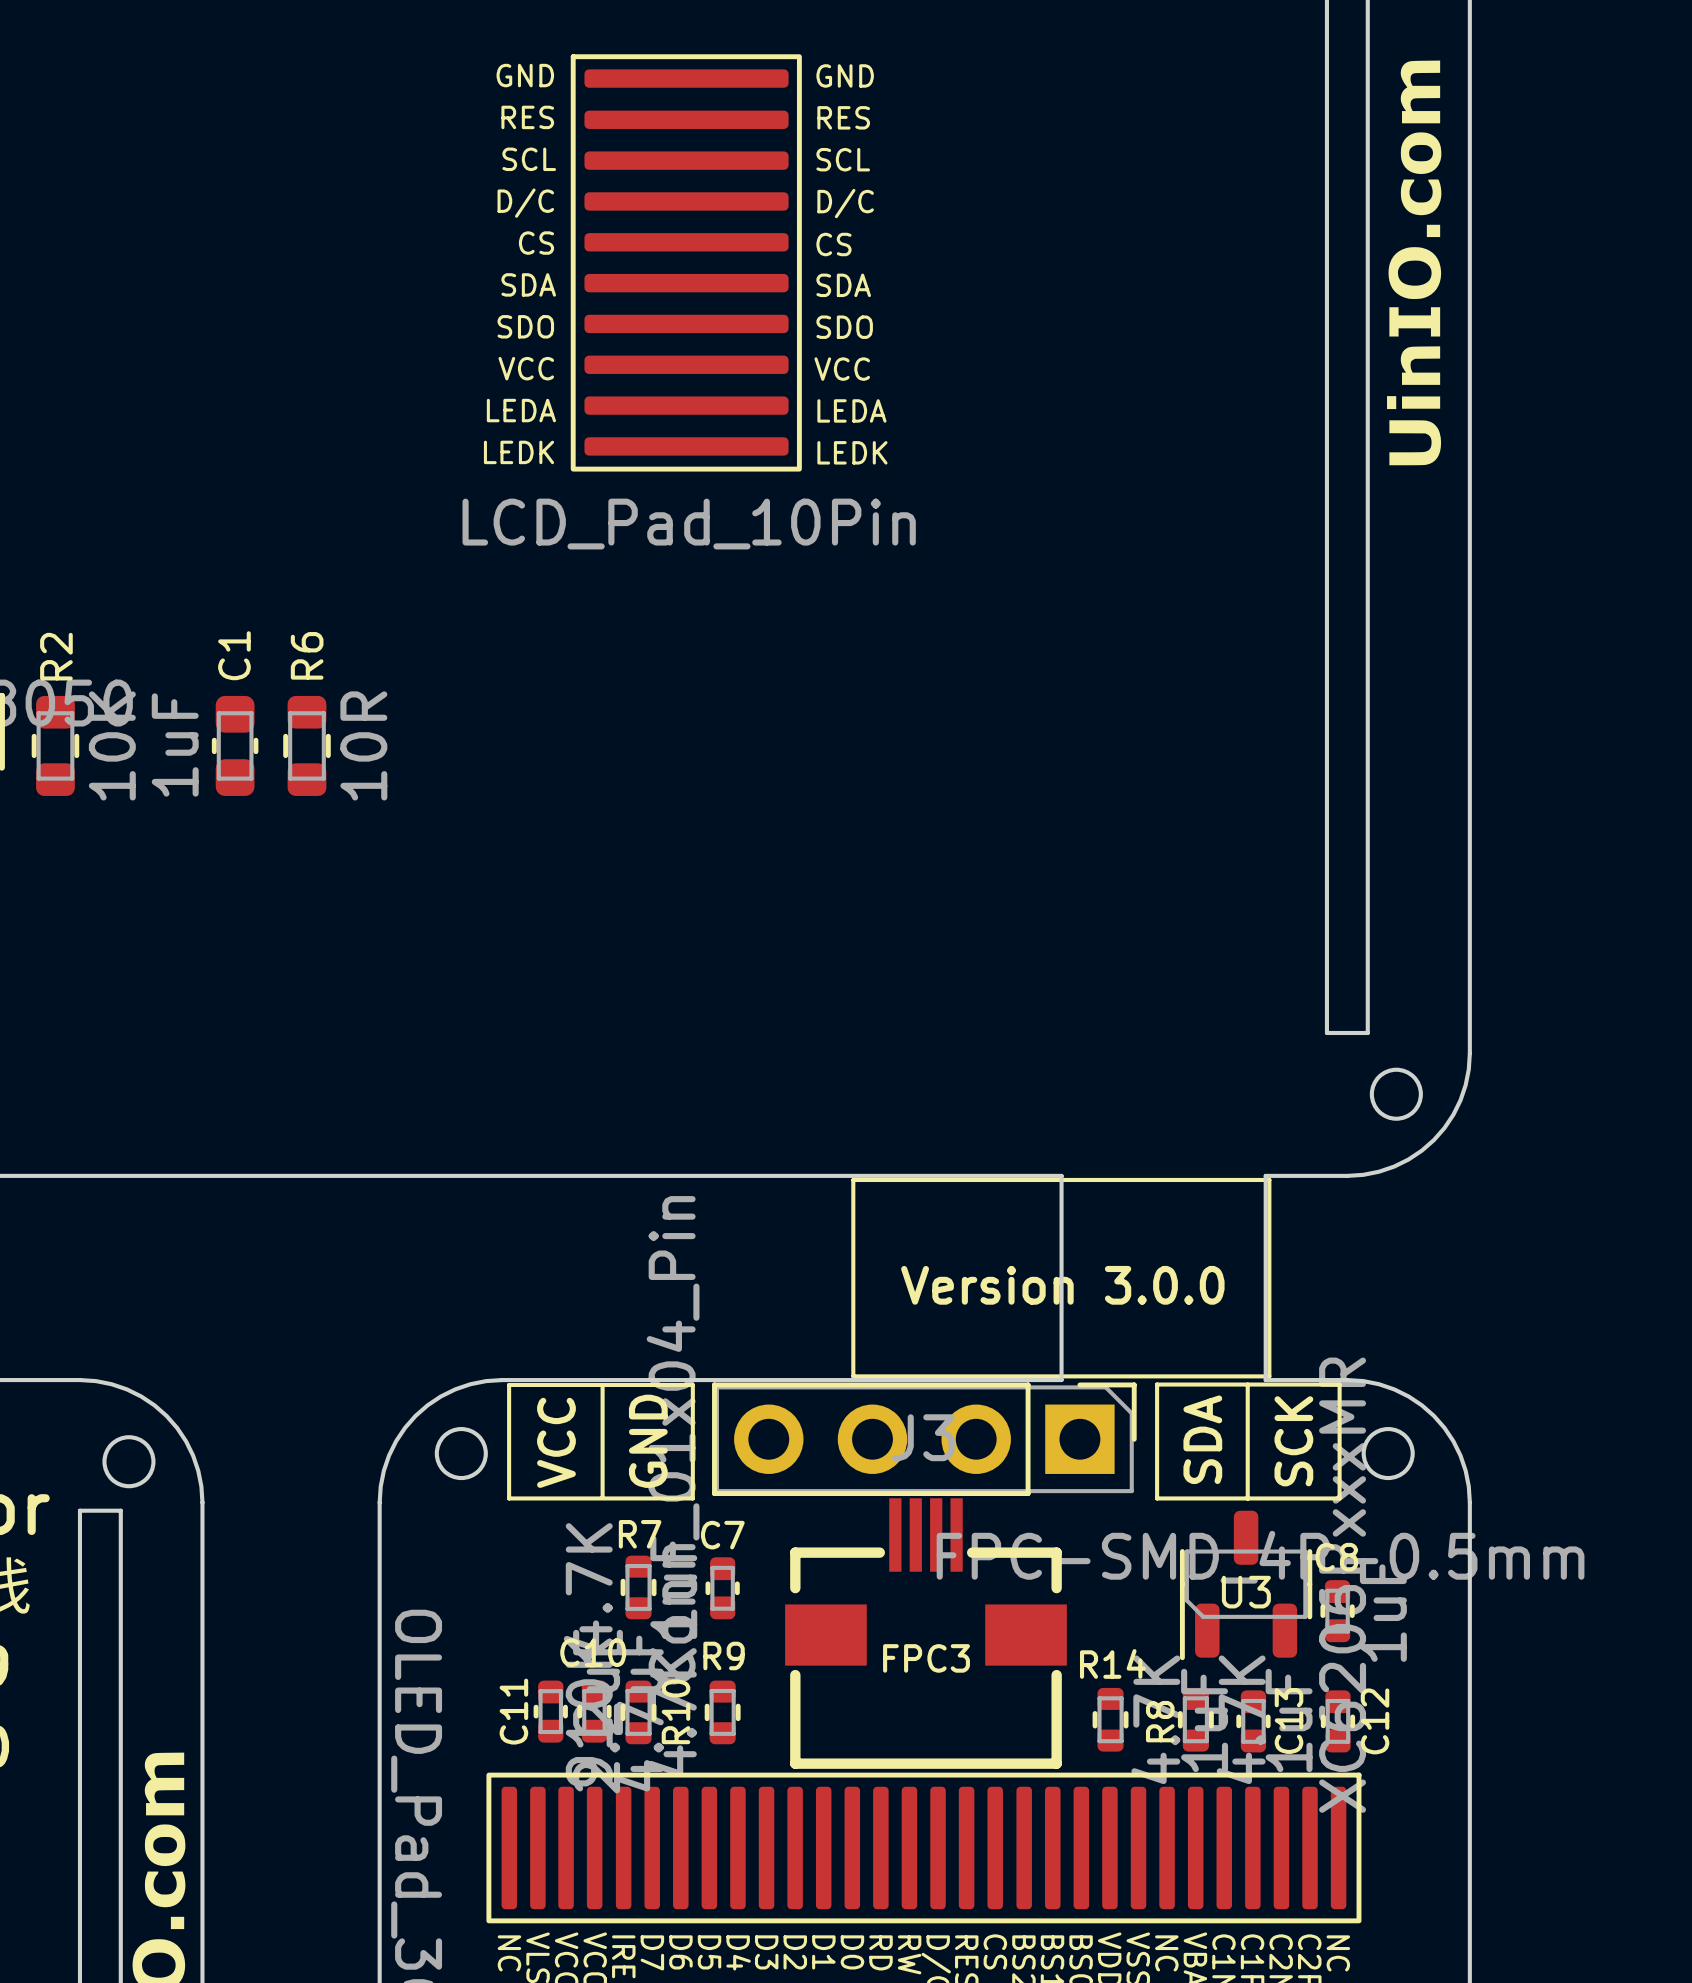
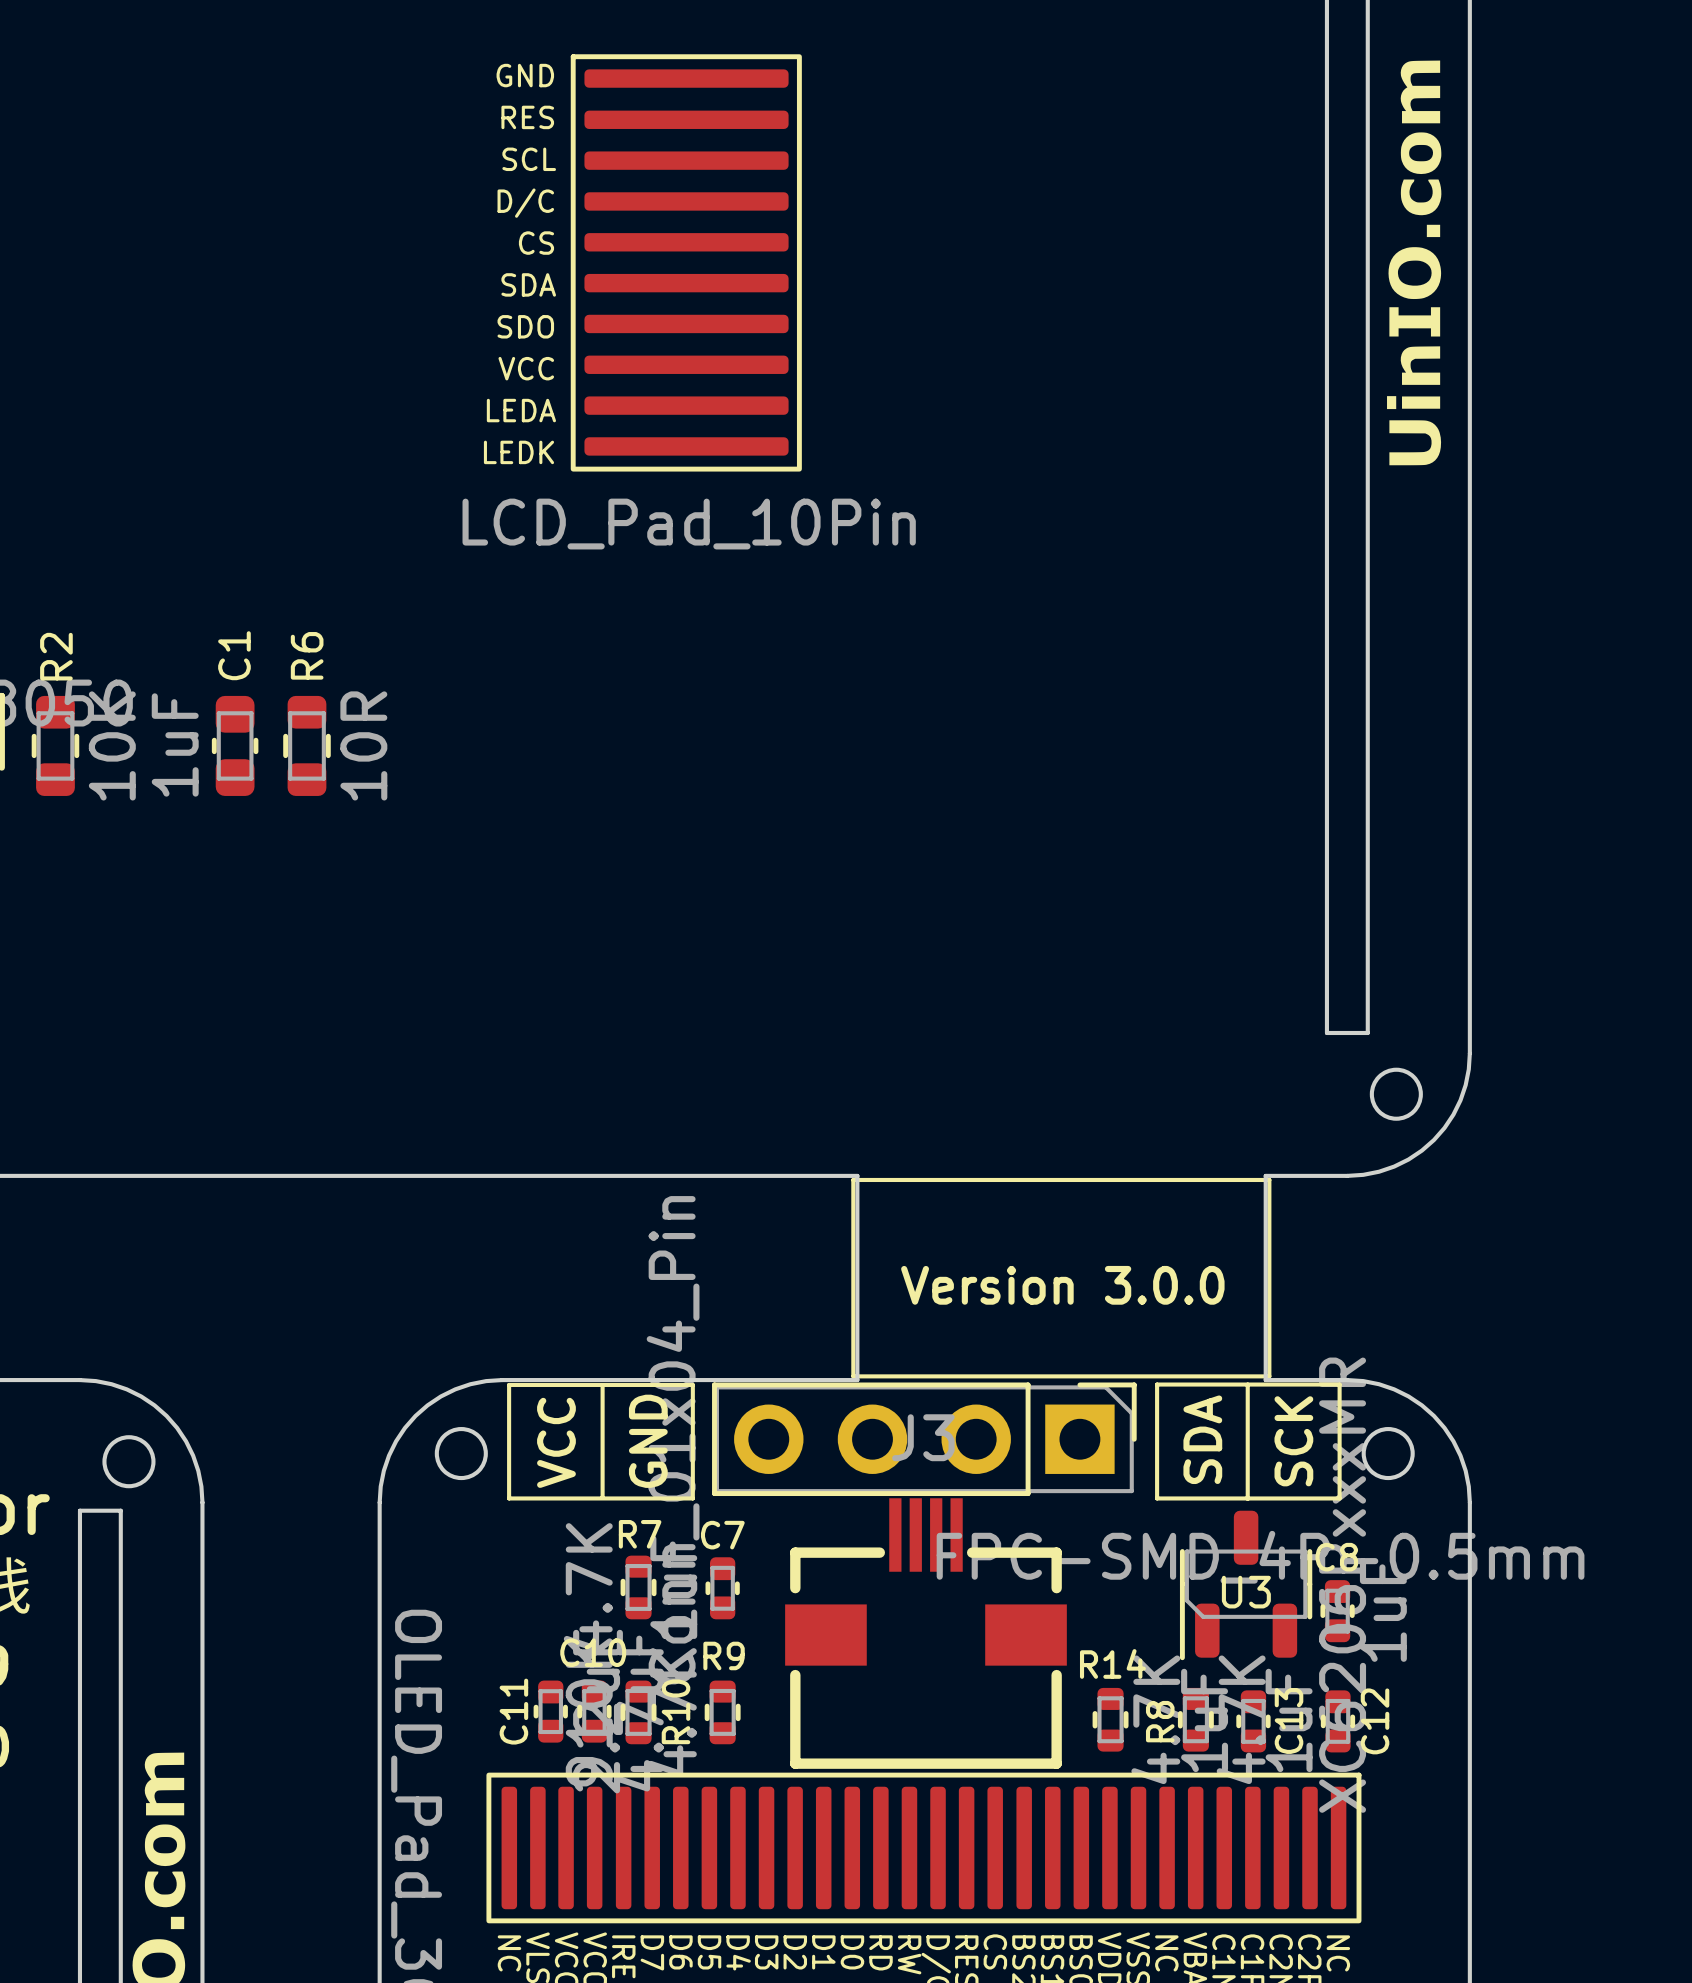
part footprint: [570, 54, 802, 472] -> [570, 54, 802, 472]
board edge: (857, 1175) (1061, 1175) (1061, 1380) (857, 1380) -> (857, 1175) (857, 1380)
FPC3 name: FPC3 (926, 1658) -> none

